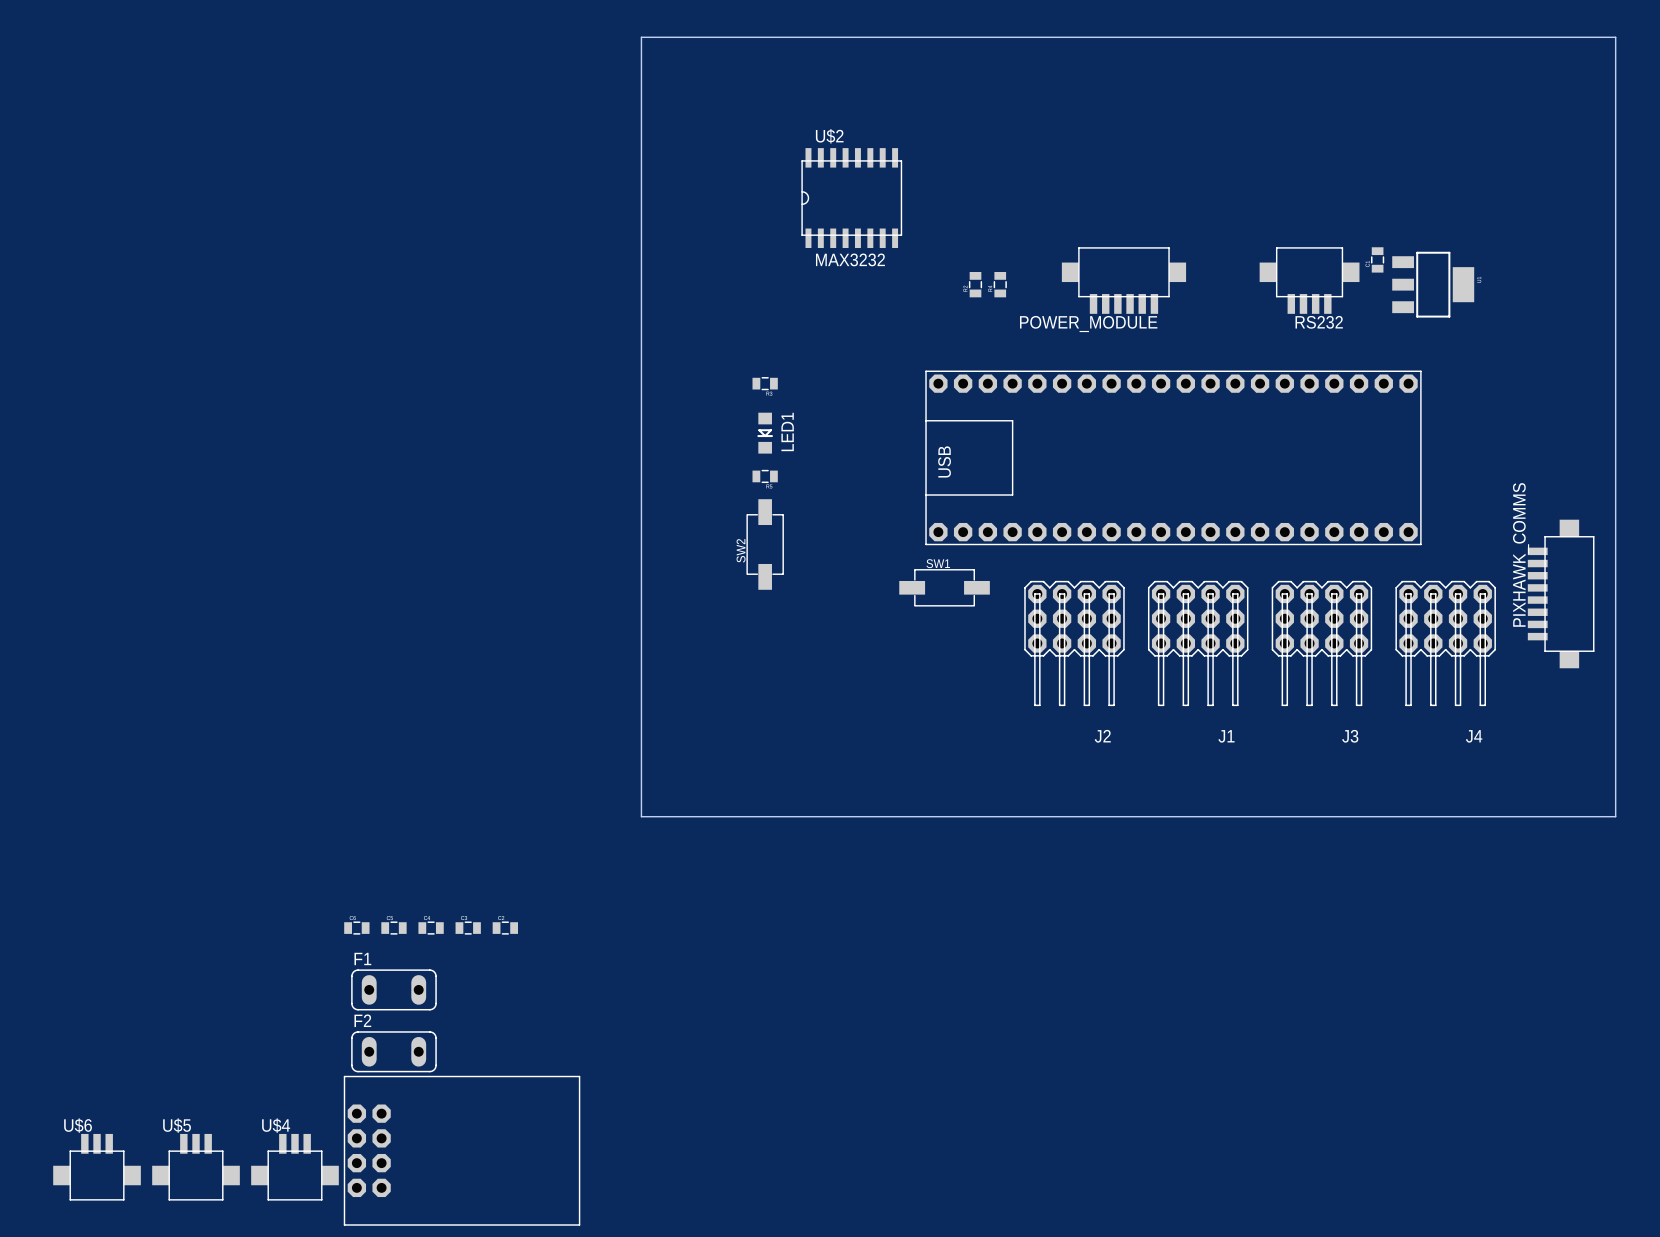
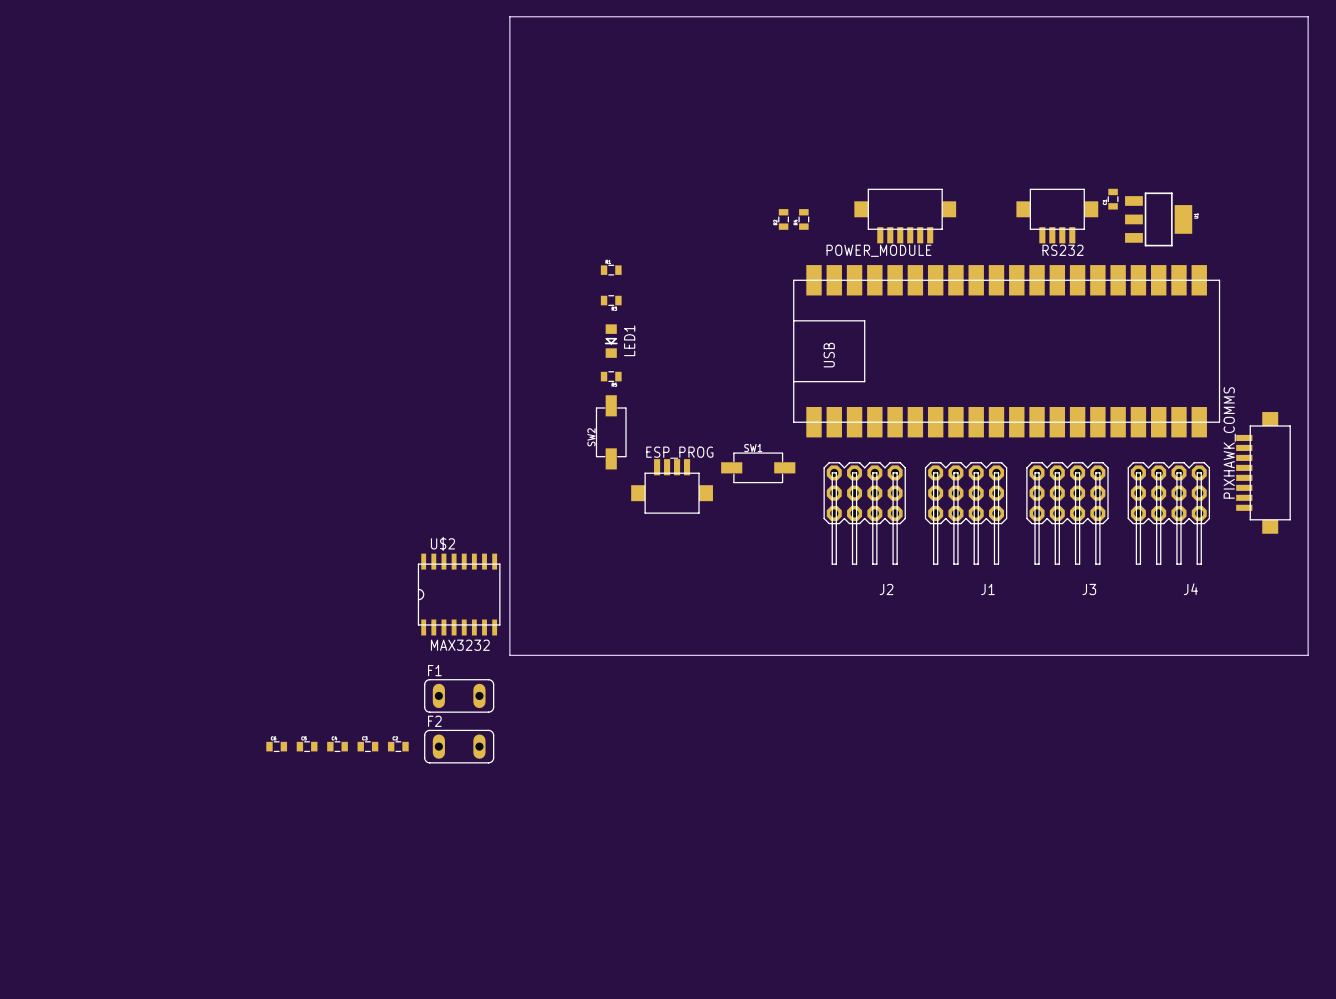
U$2 position: (851, 198) -> (459, 594)
part: none -> (611, 270)
part: none -> (1006, 351)
part: (1173, 457) -> none
ESP_PROG: none -> (672, 486)
F1 position: (393, 989) -> (459, 695)
F2 position: (393, 1051) -> (459, 746)
part: (462, 1150) -> none
U$6: (97, 1167) -> none
U$5: (196, 1167) -> none
U$4: (294, 1167) -> none

